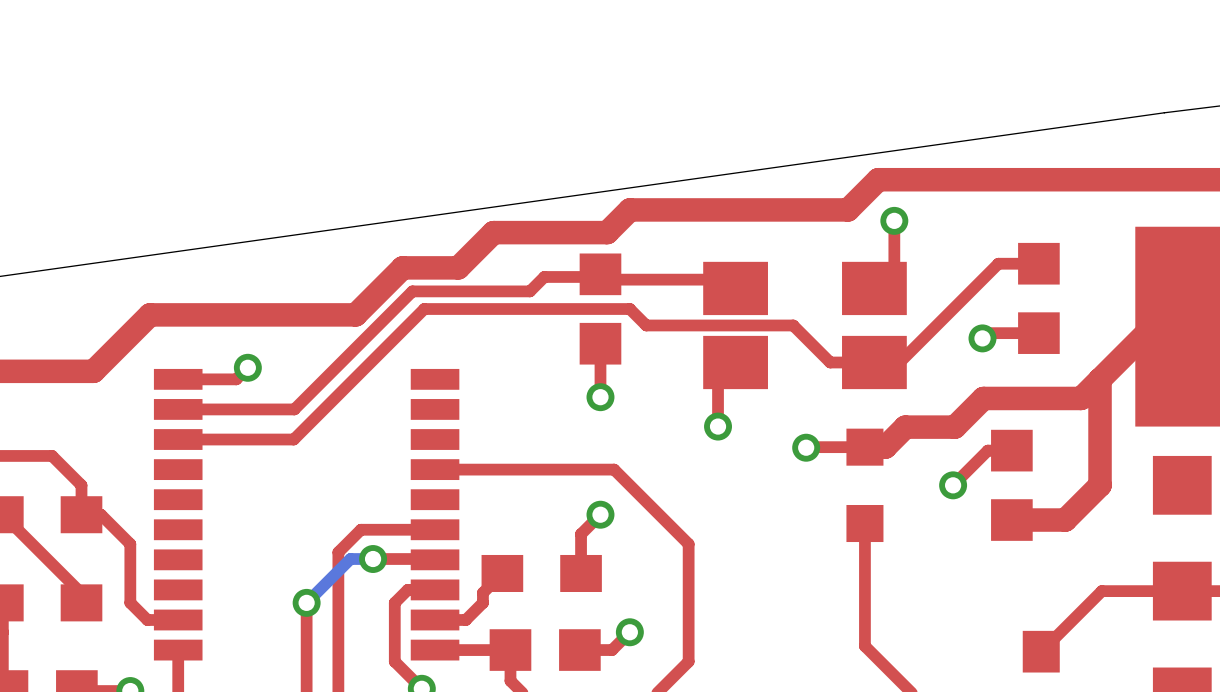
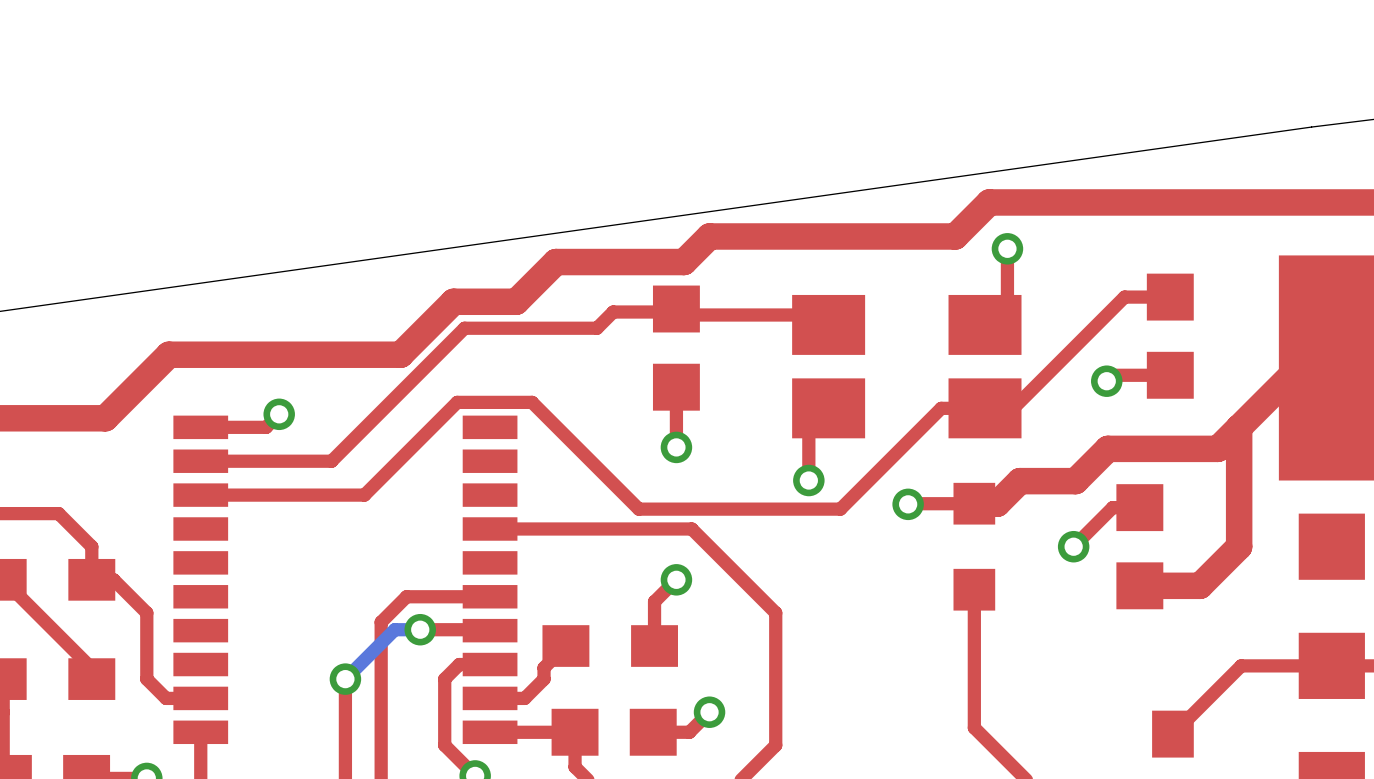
top track: (835, 362) (830, 362) (793, 325) (646, 325) (629, 309) (424, 309) (293, 439) -> (941, 408) (840, 509) (638, 509) (532, 402) (457, 402) (364, 495) (330, 495)

